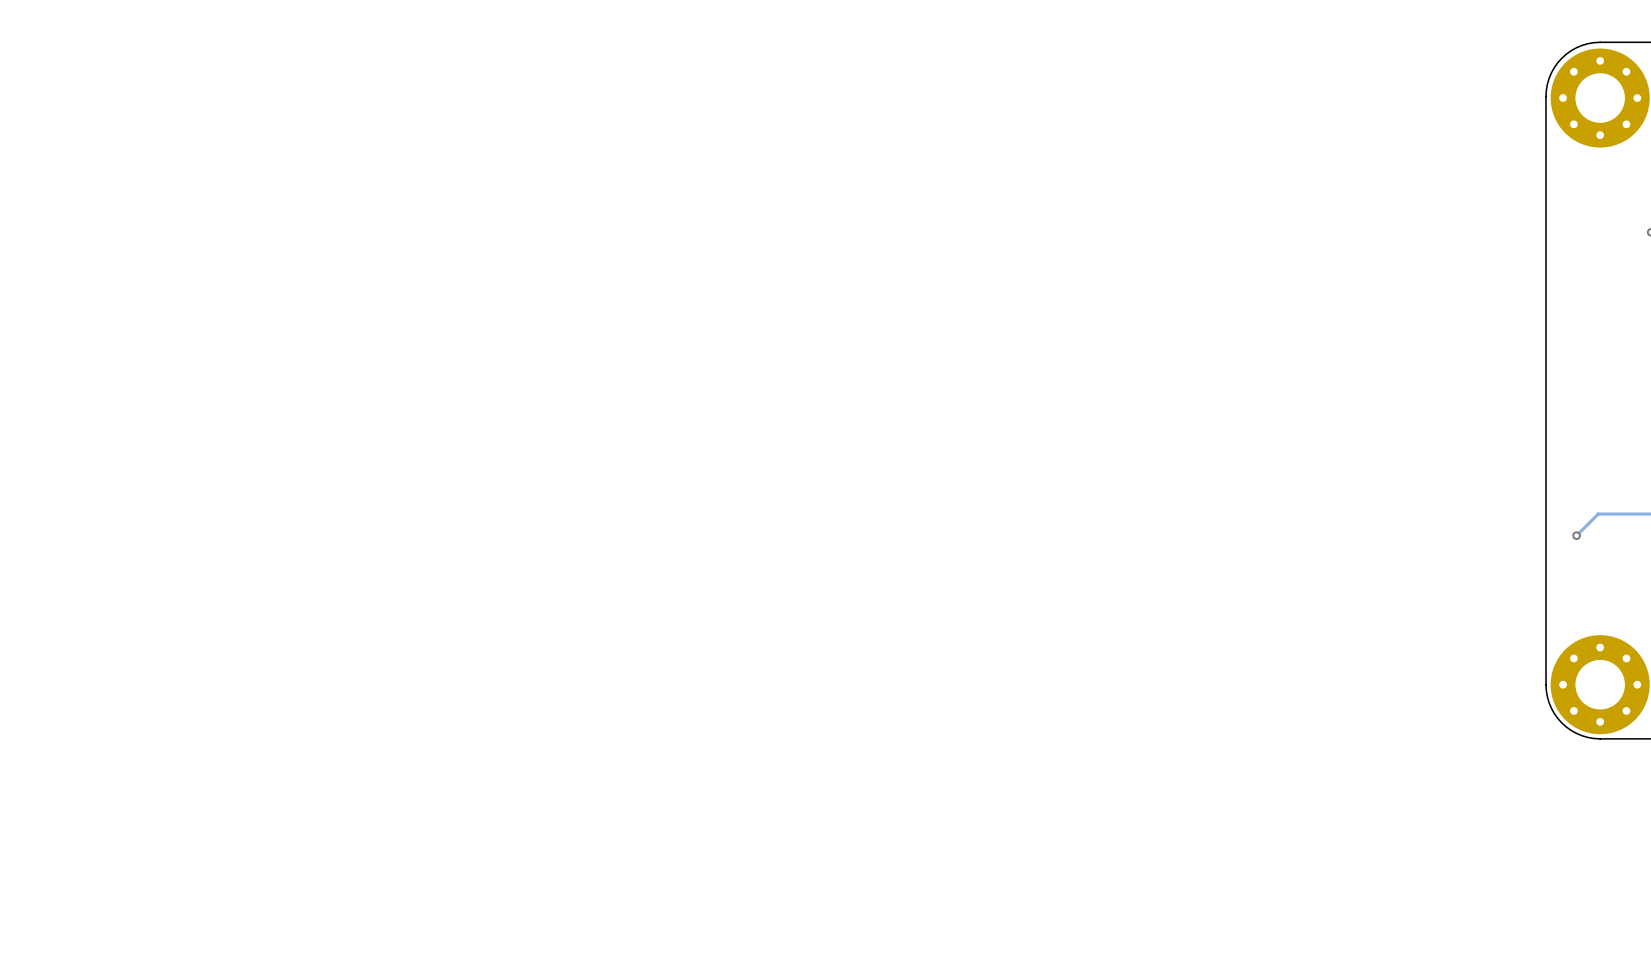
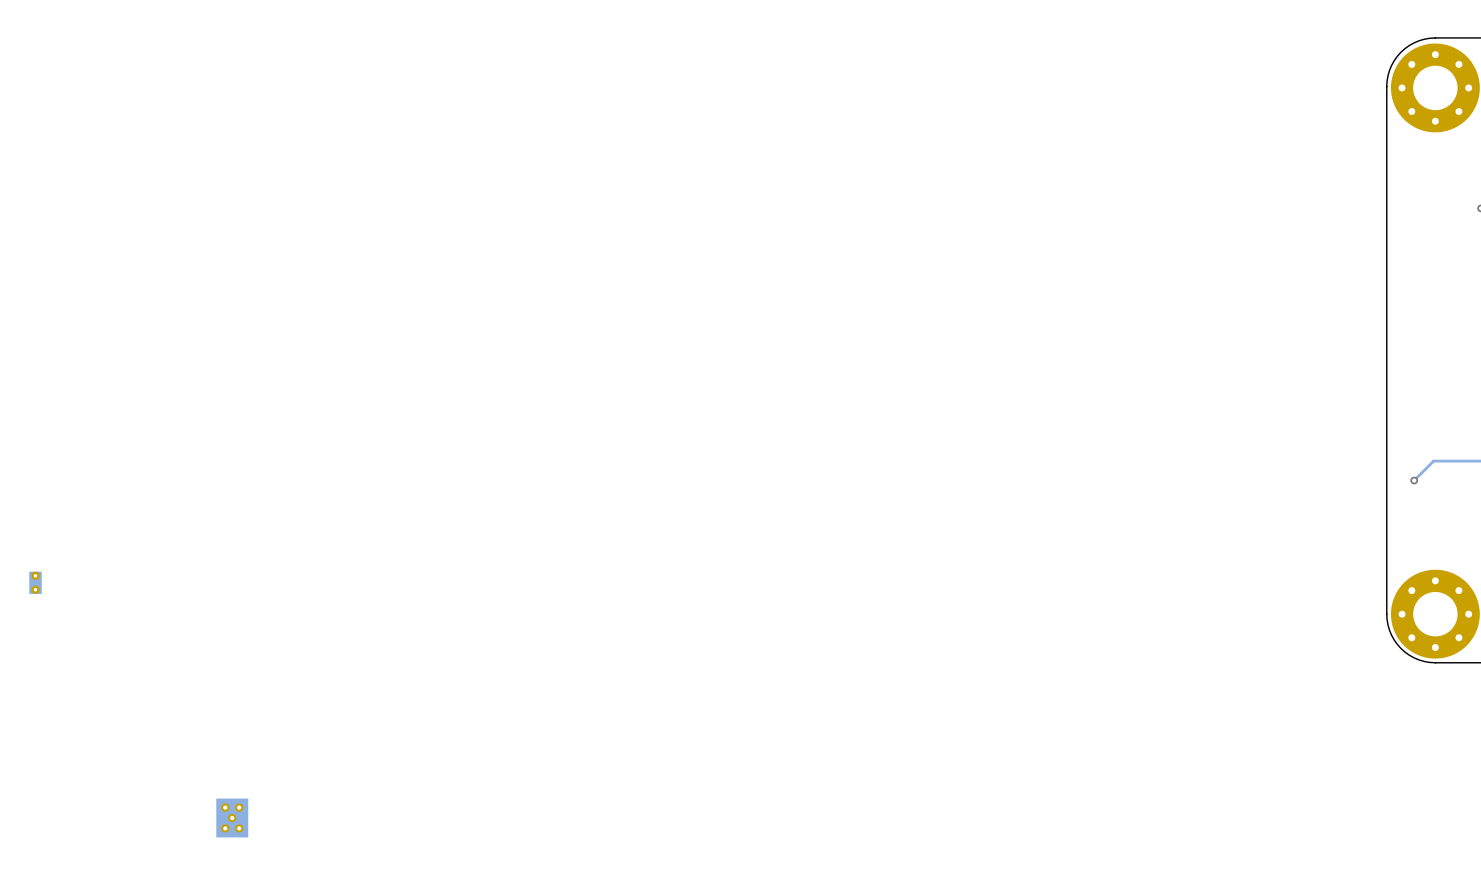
part: none -> (35, 582)
part: none -> (232, 818)

